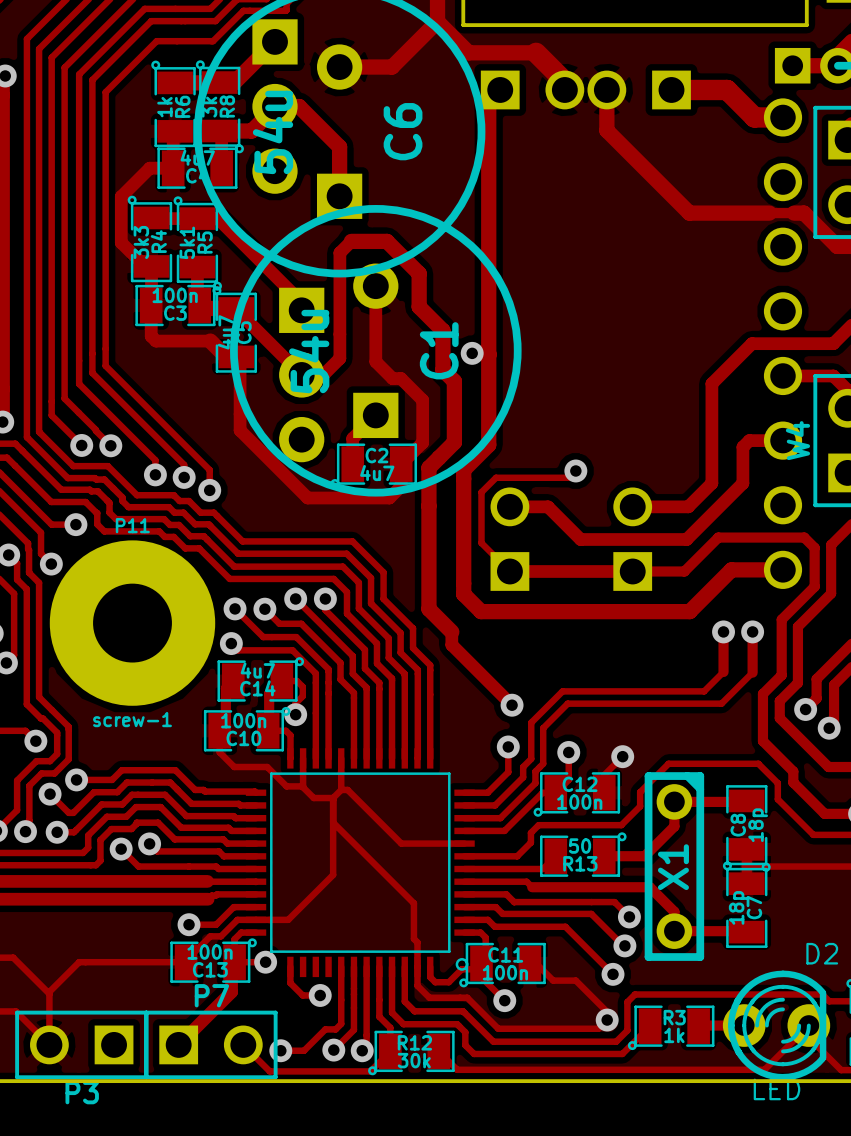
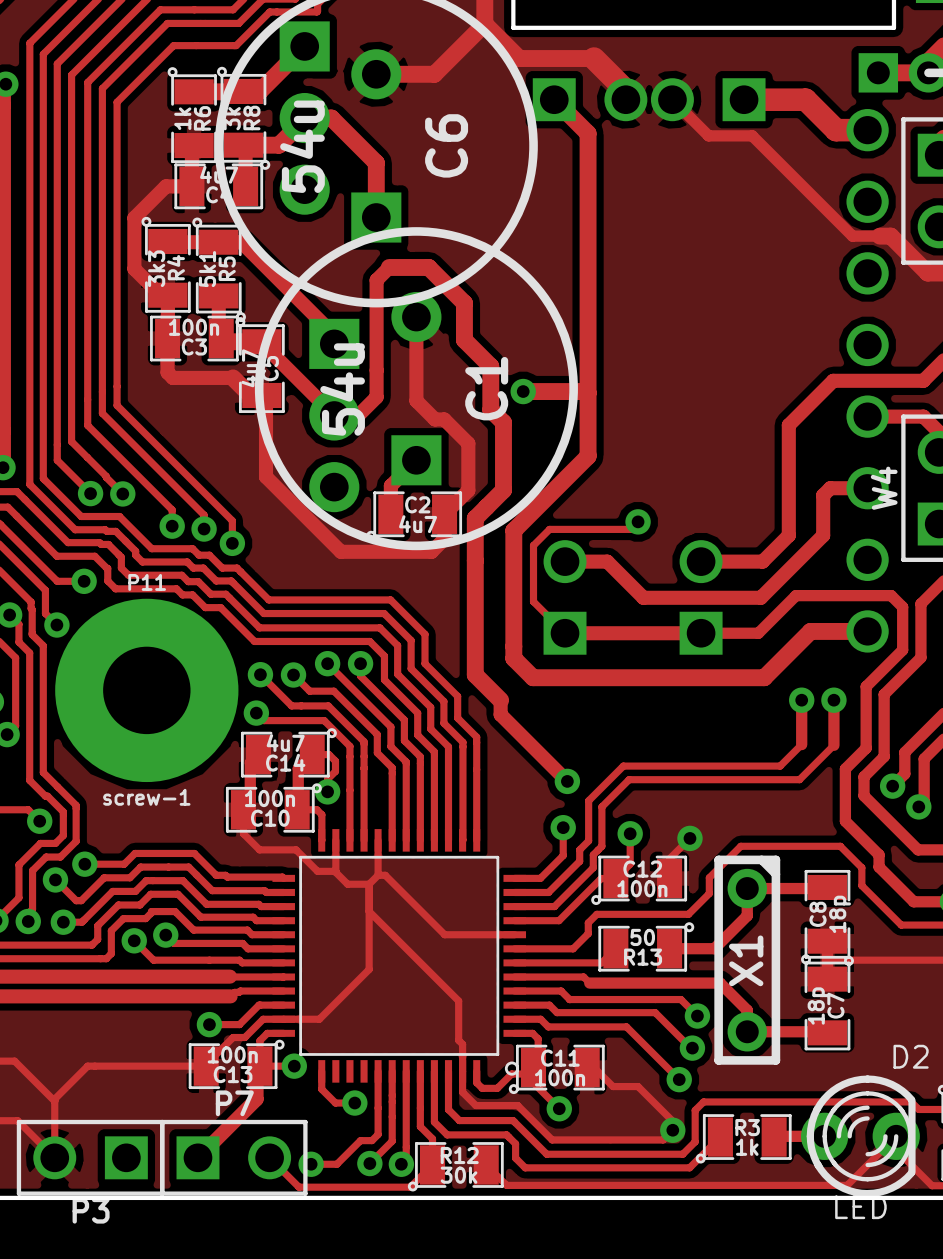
track: (500, 89) (488, 101) (488, 444) (463, 469) (463, 478) -> (554, 99) (588, 133) (588, 456) (513, 530)
track: (606, 89) (606, 130) (689, 213) (769, 213) -> (672, 99) (708, 135) (752, 135) (852, 236)
track: none -> (541, 391) (588, 392)

